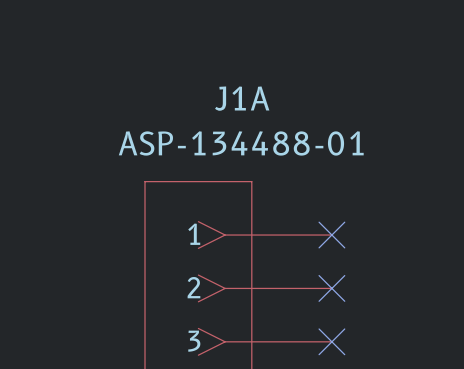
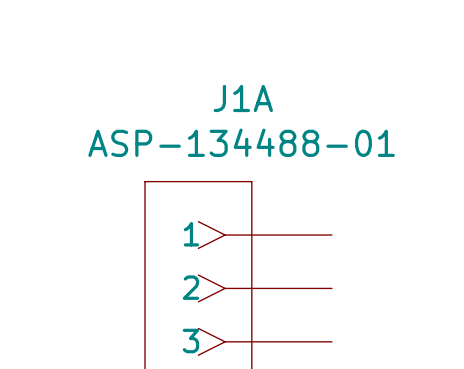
no-connect mark: (331, 235) -> none
no-connect mark: (331, 288) -> none
no-connect mark: (331, 341) -> none

